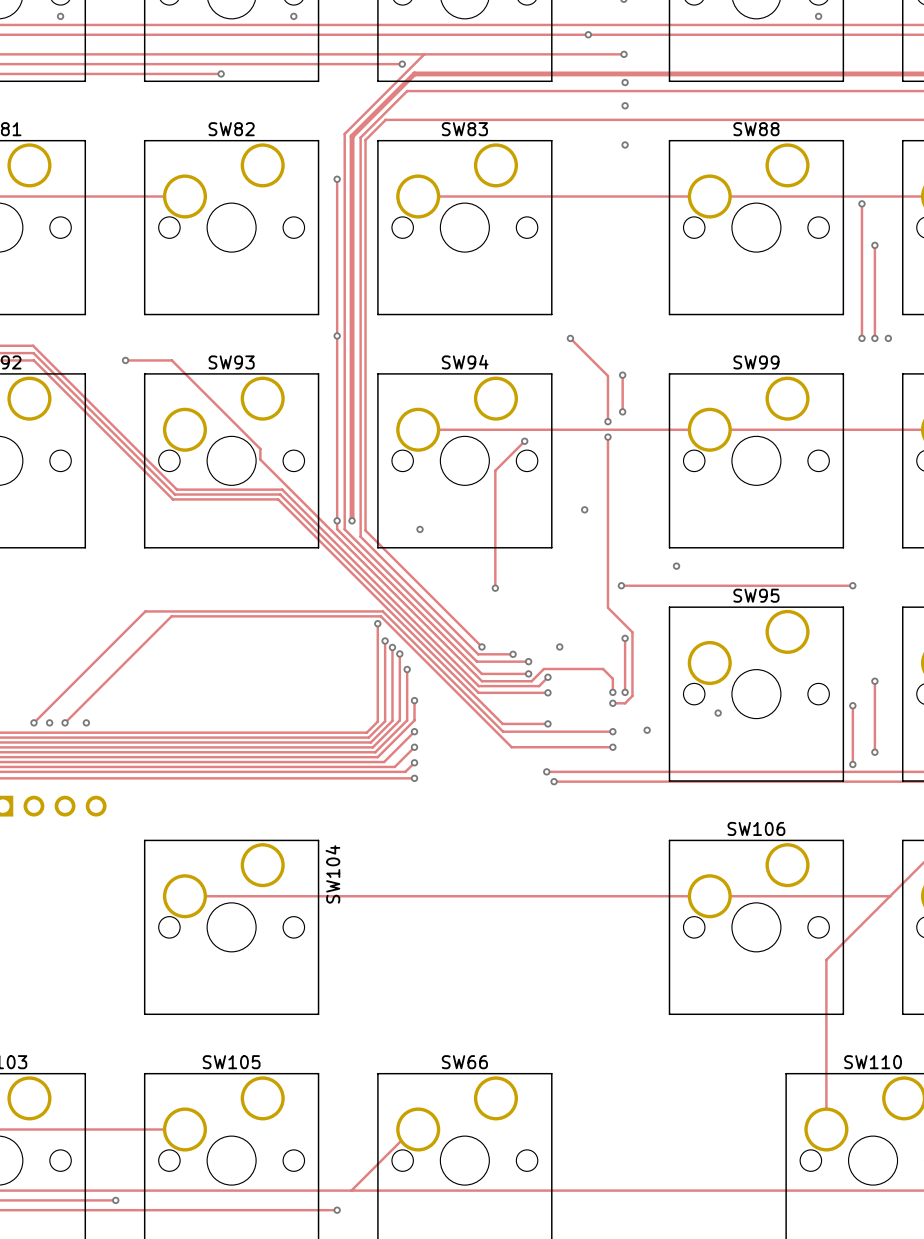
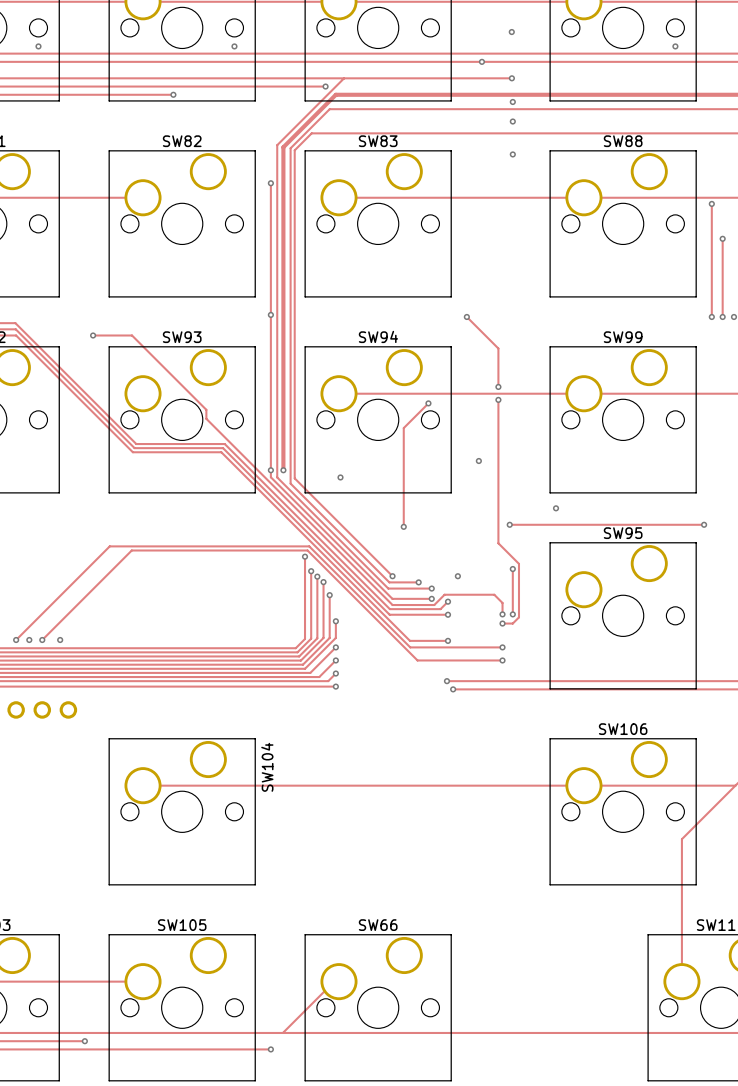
track: (622, 375) (622, 411) -> none
via: (622, 375) -> none
via: (622, 411) -> none
track: (874, 681) (874, 752) -> none
via: (874, 681) -> none
track: (852, 705) (852, 764) -> none
via: (852, 705) -> none
via: (718, 713) -> none
via: (647, 730) -> none
via: (874, 752) -> none
via: (852, 764) -> none

